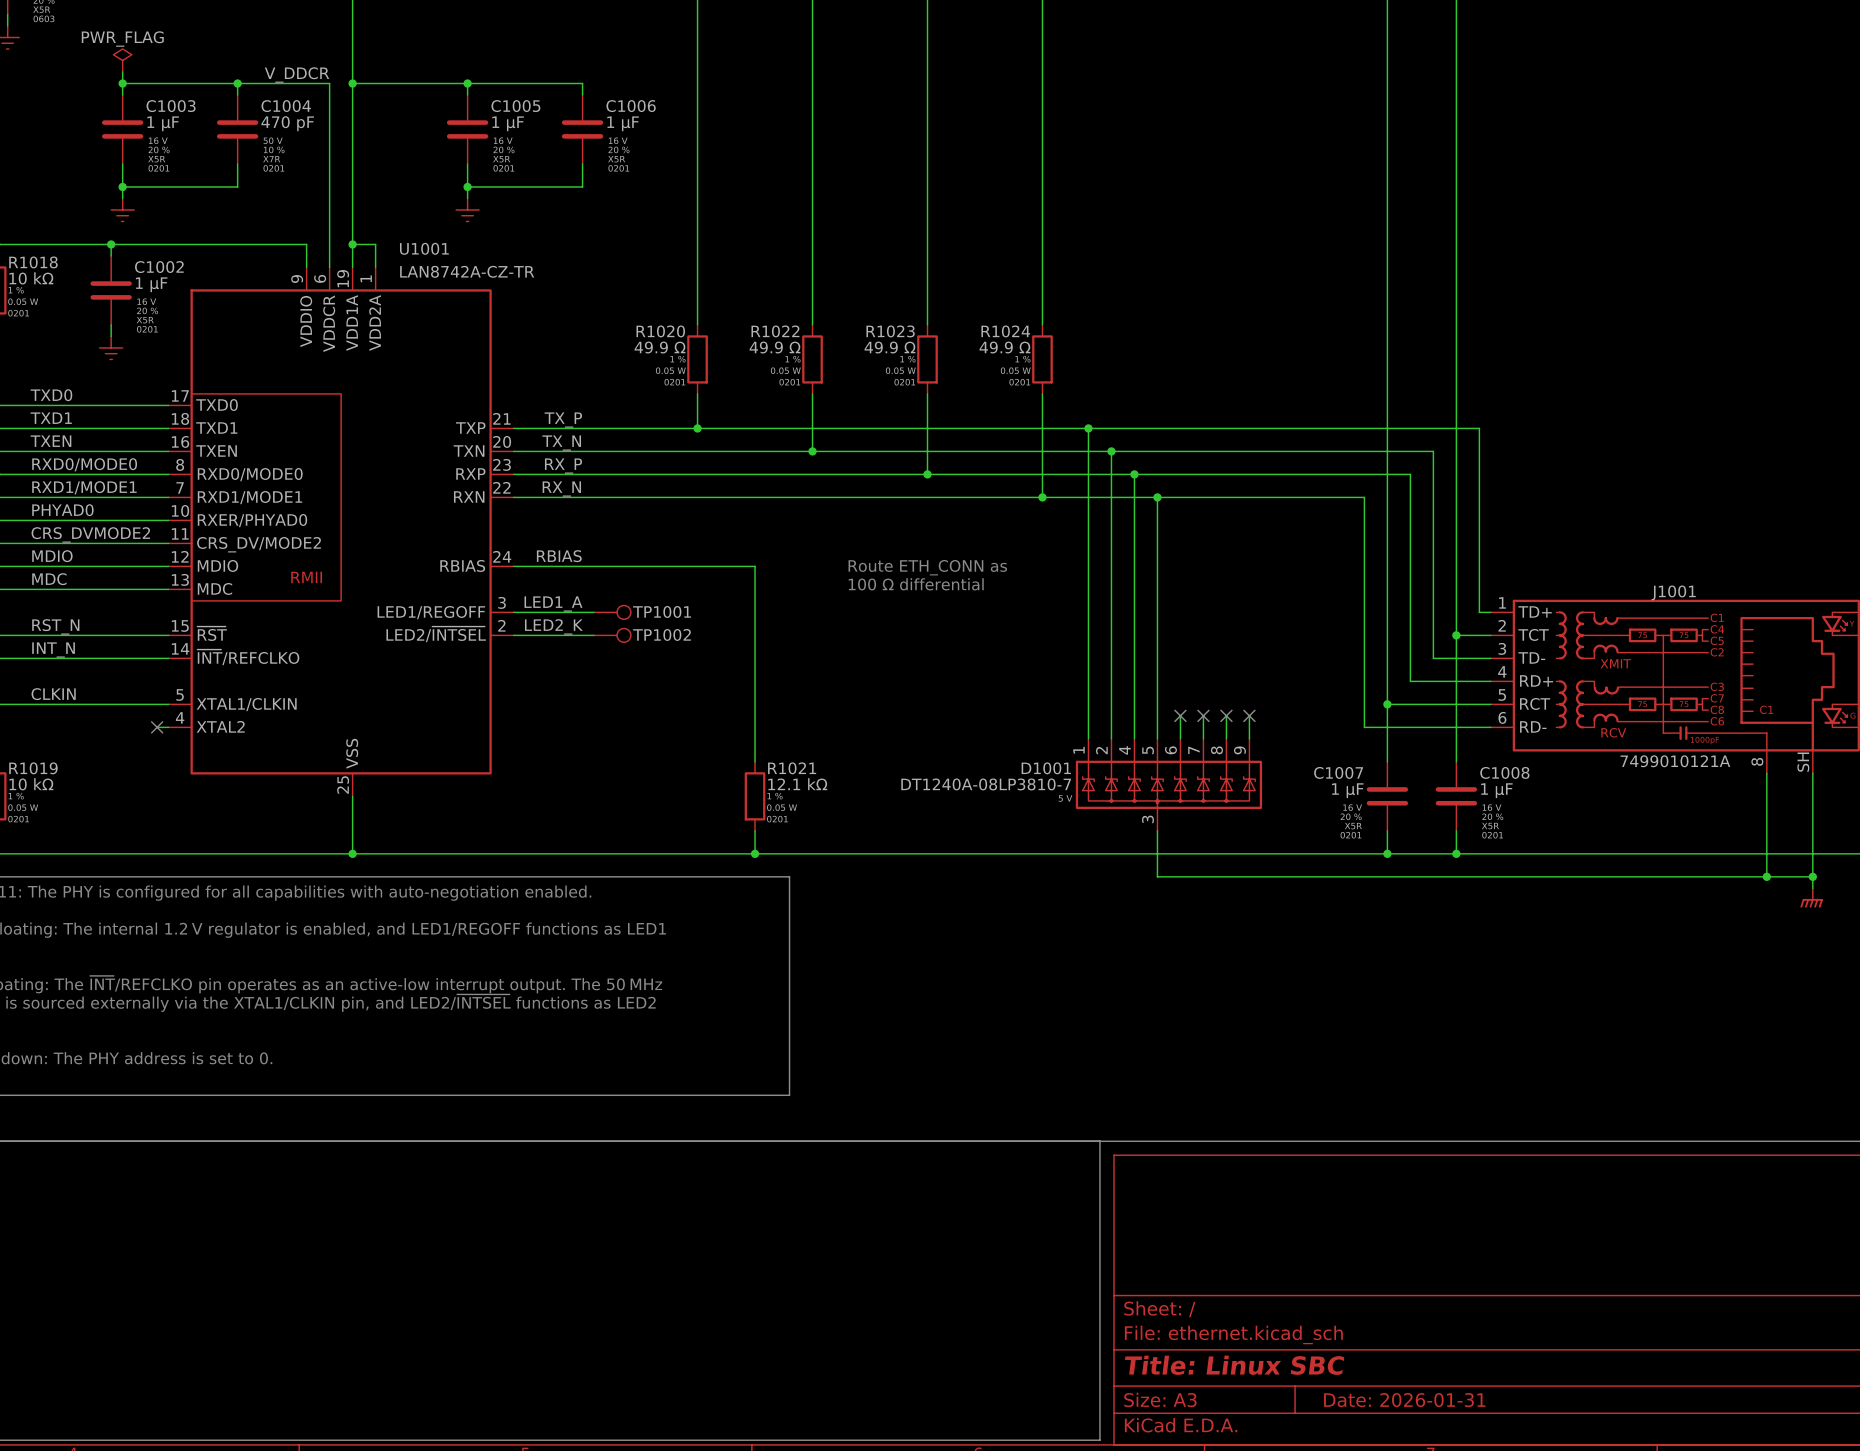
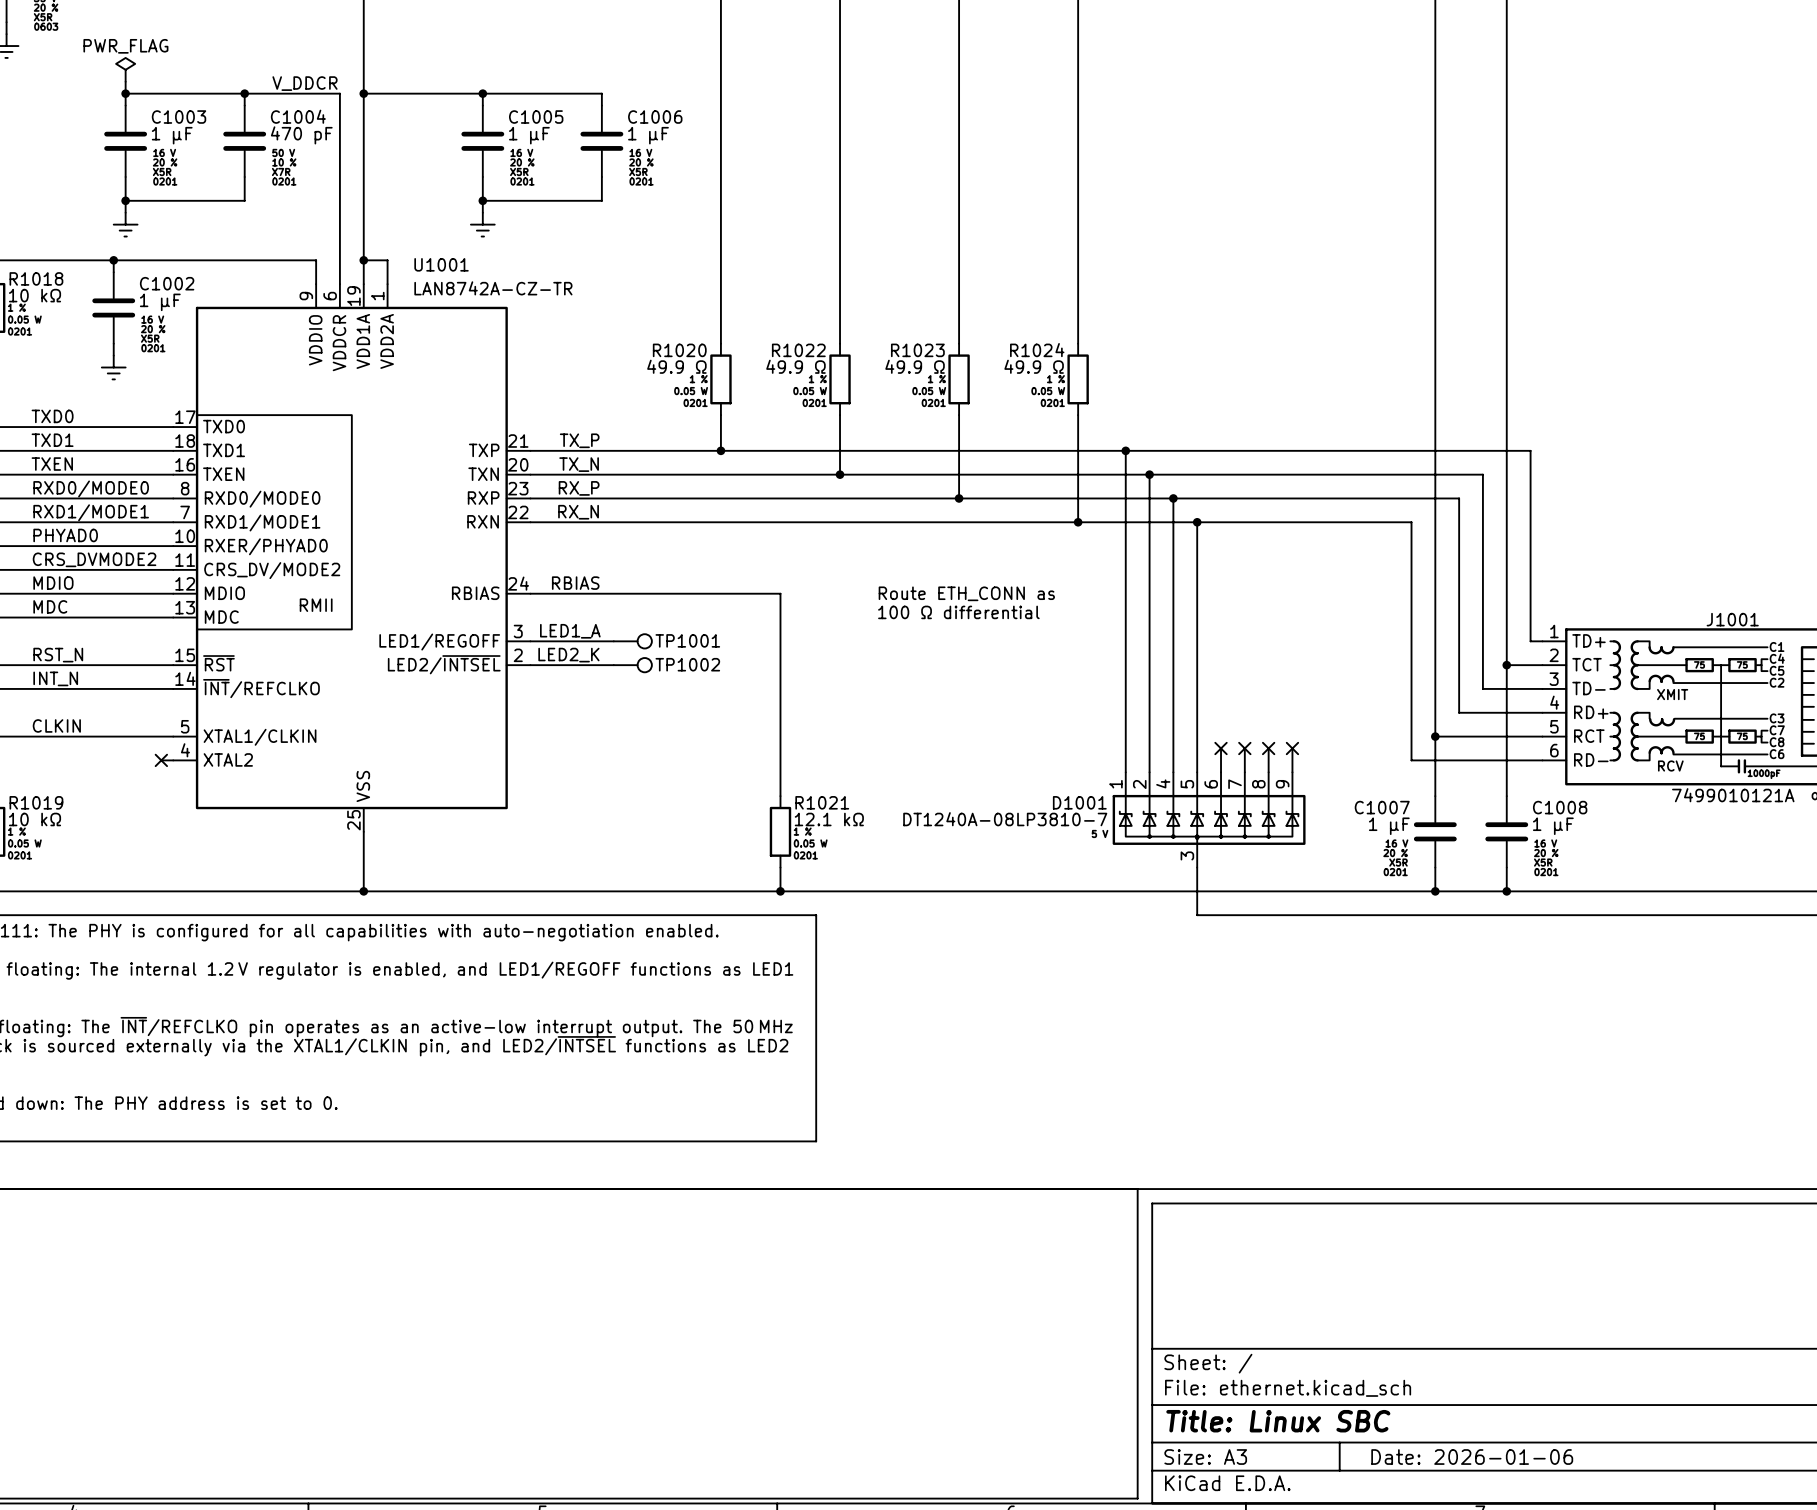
title block: Date: 2026-01-31 (1404, 1400) -> Date: 2026-01-06 (1472, 1457)

